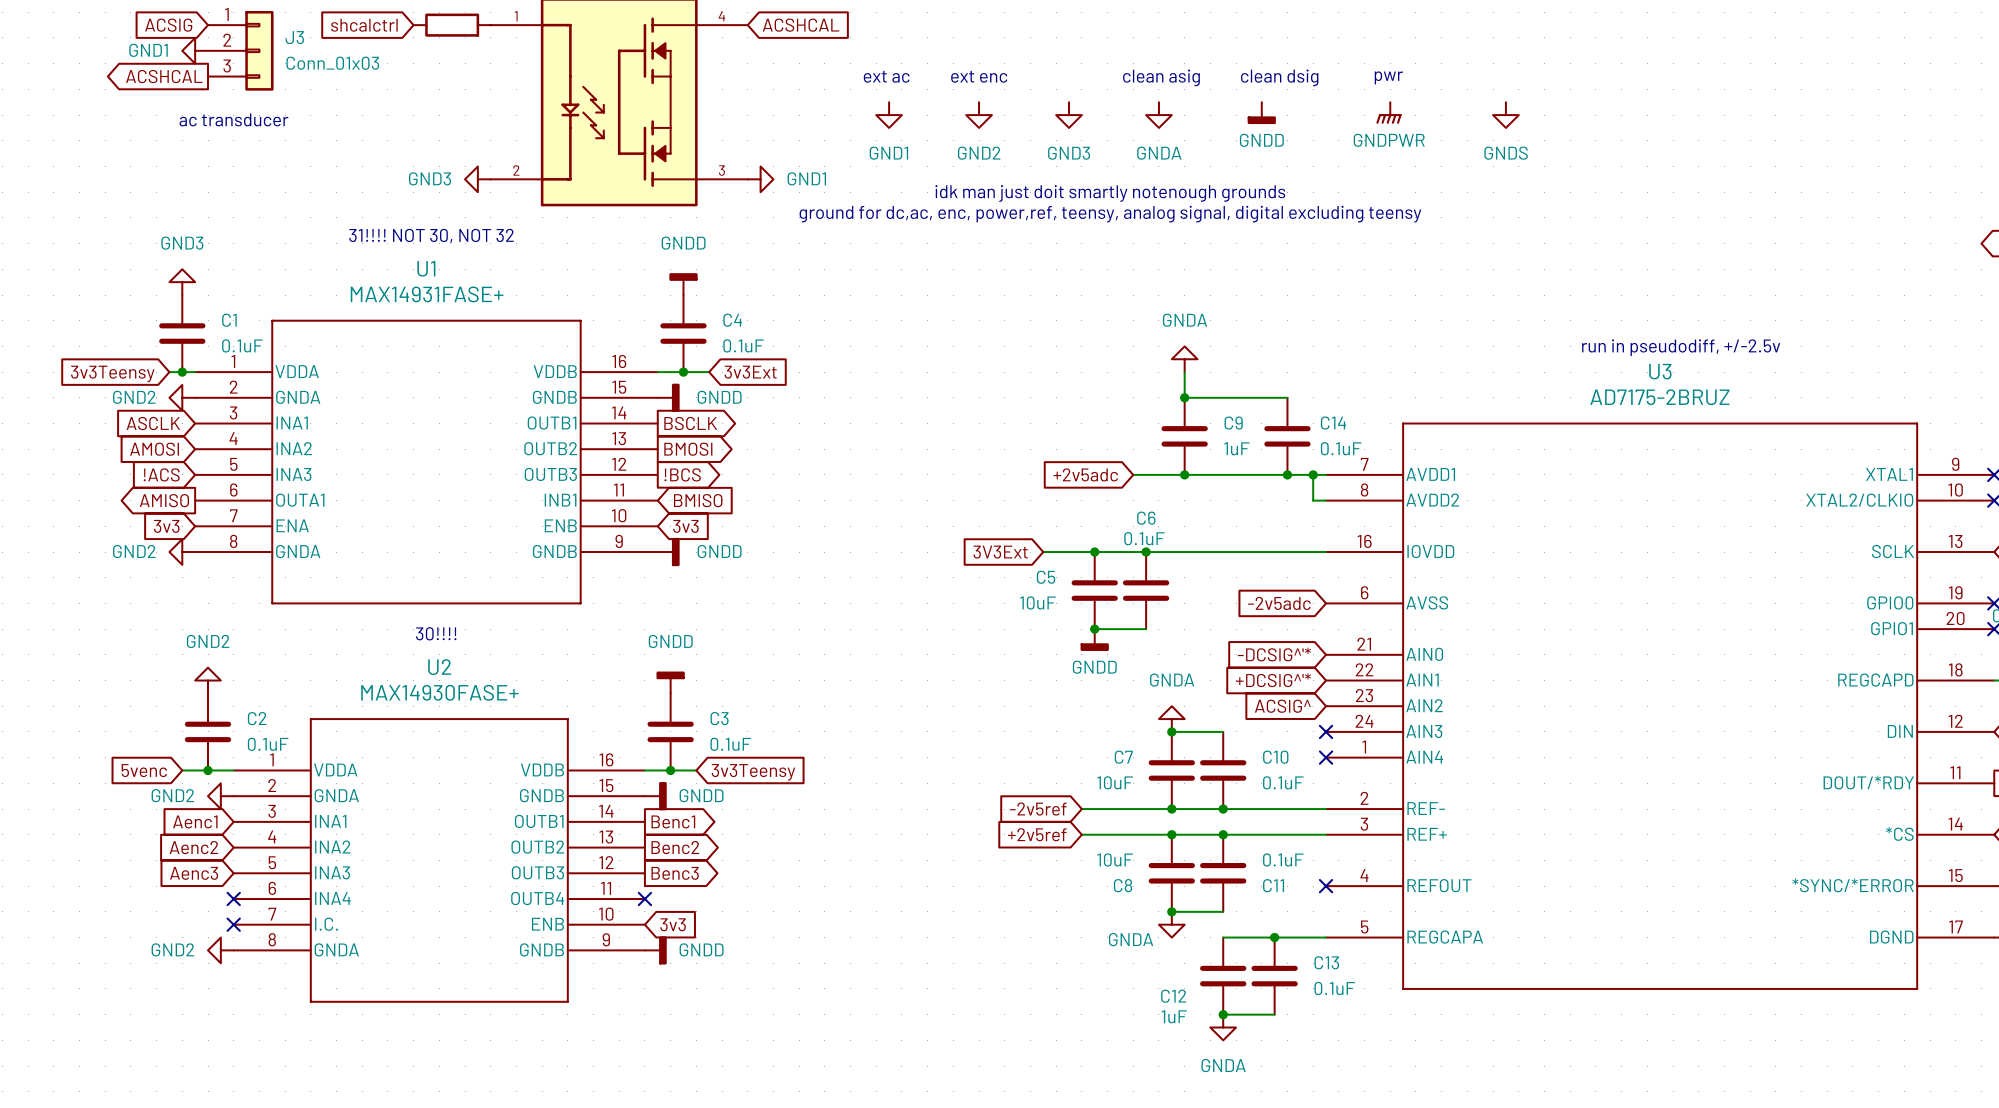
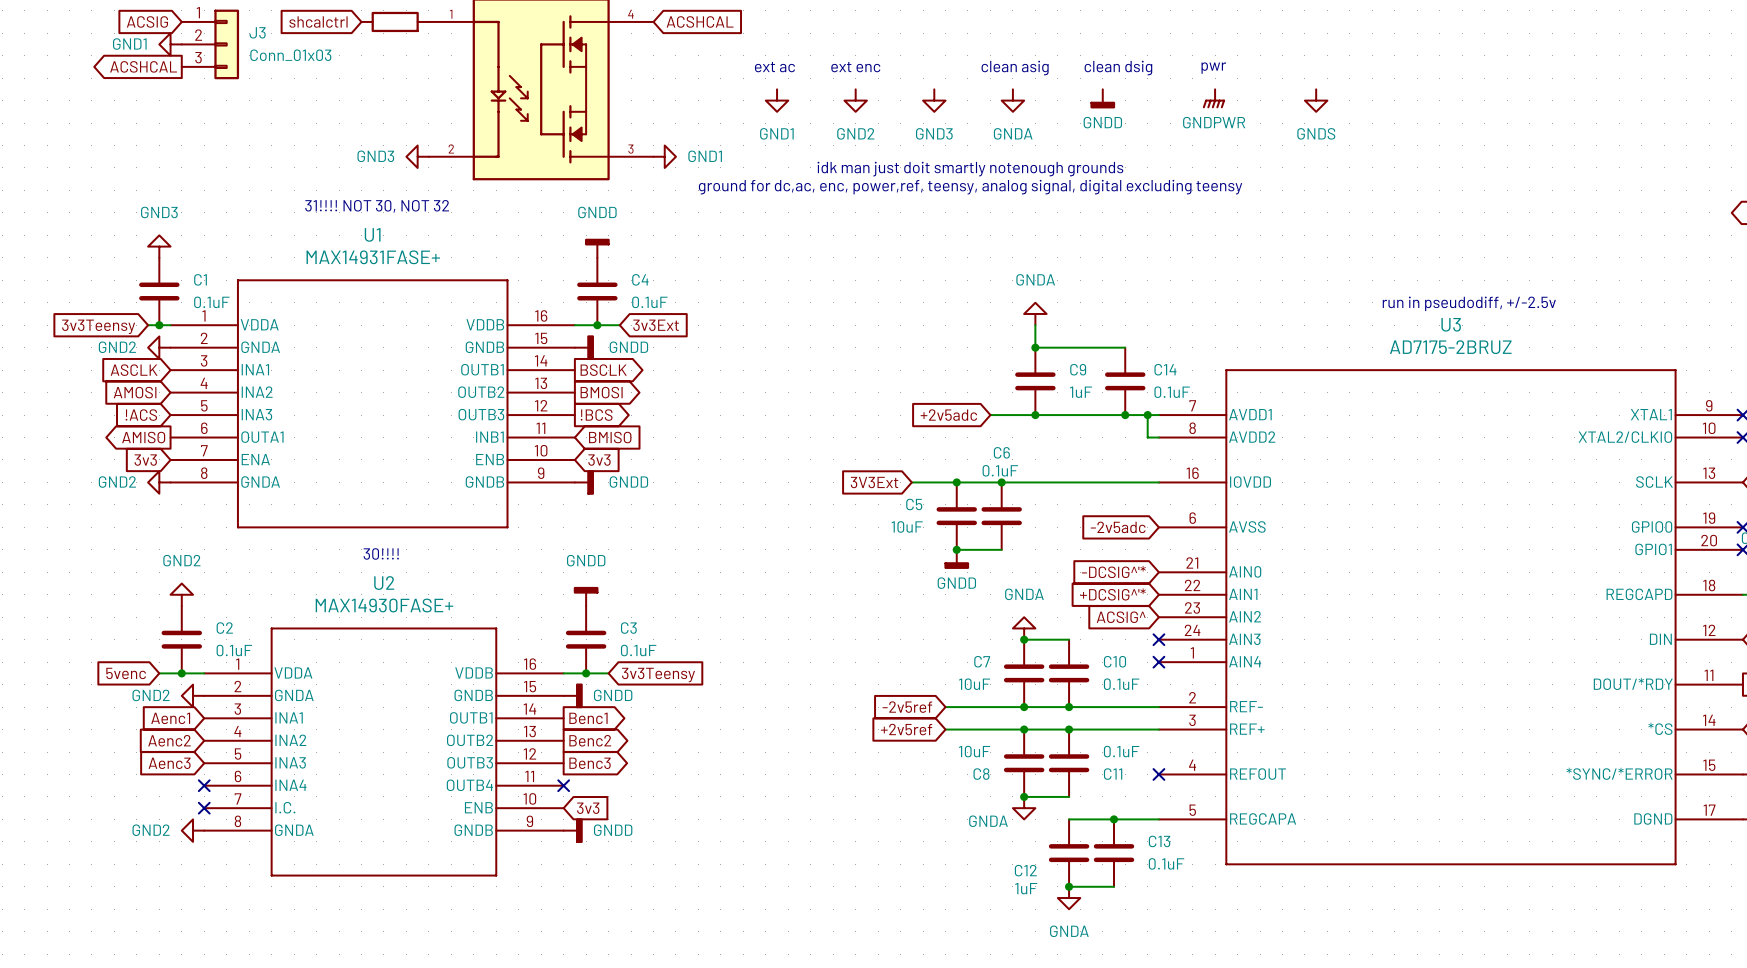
text: ac transducer (233, 119) -> none

